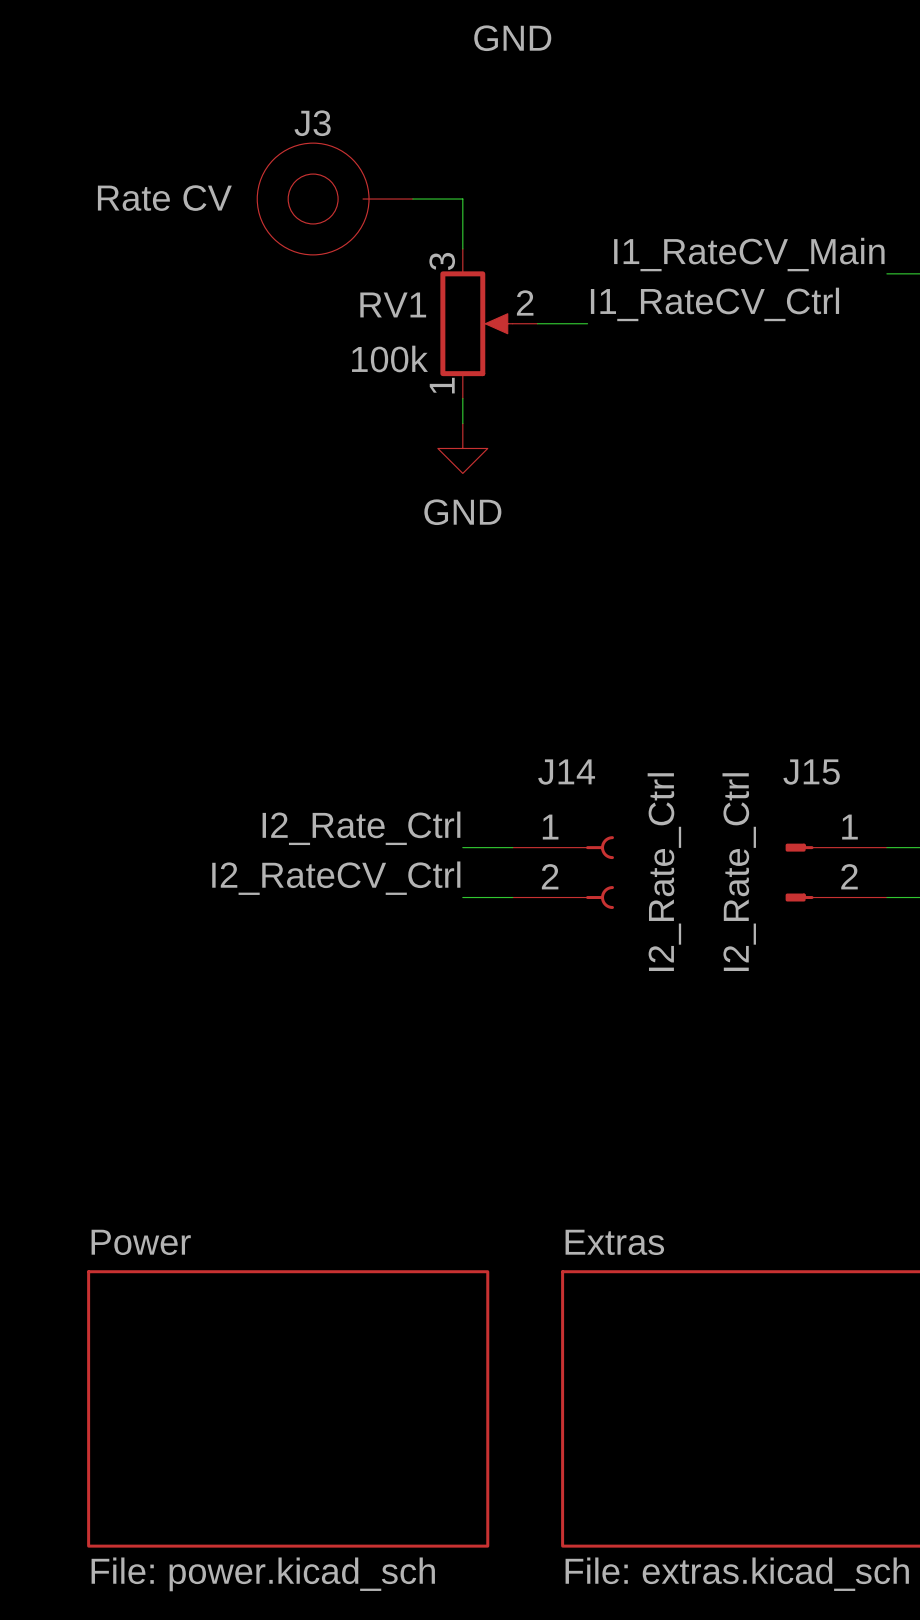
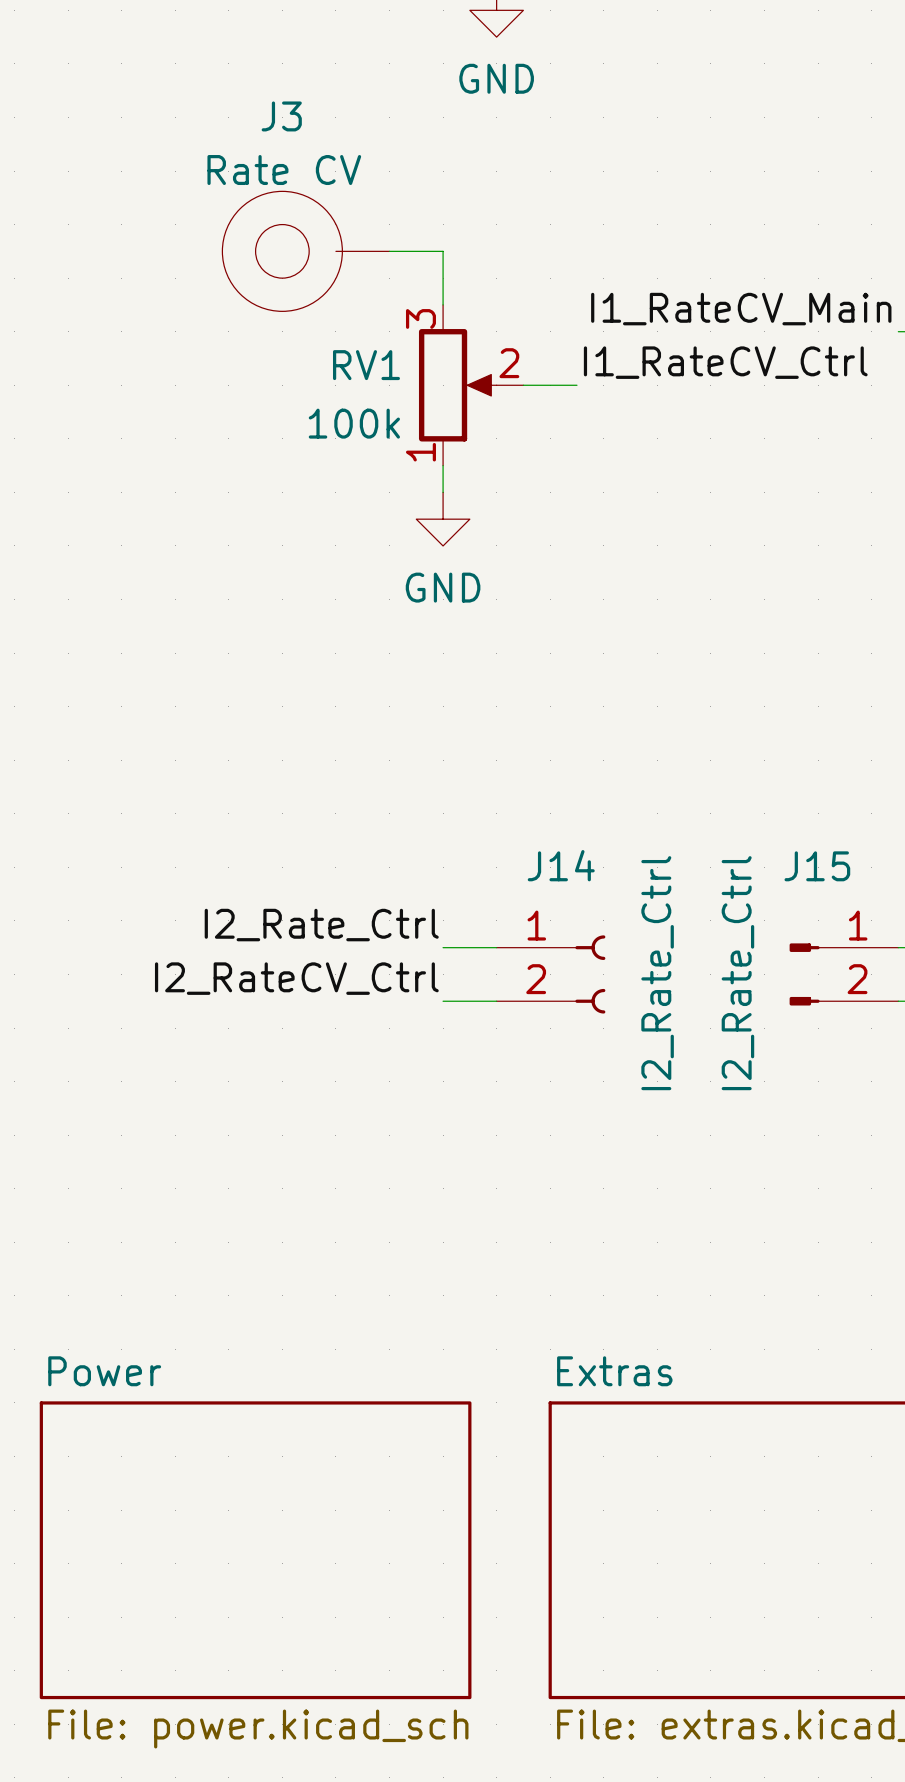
J3 name position: J3 (312, 123) -> J3 (281, 116)
J3 text position: Rate CV (164, 198) -> Rate CV (284, 170)

